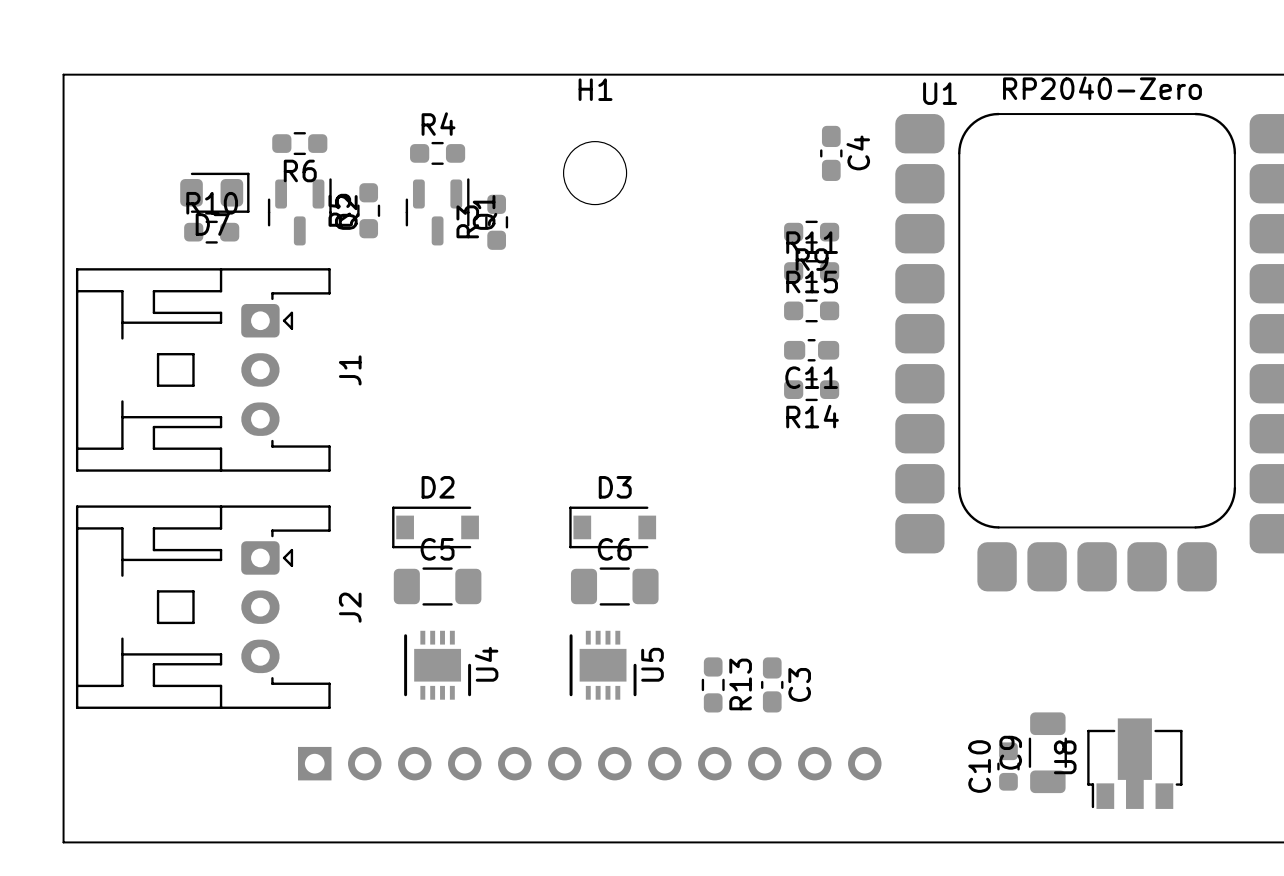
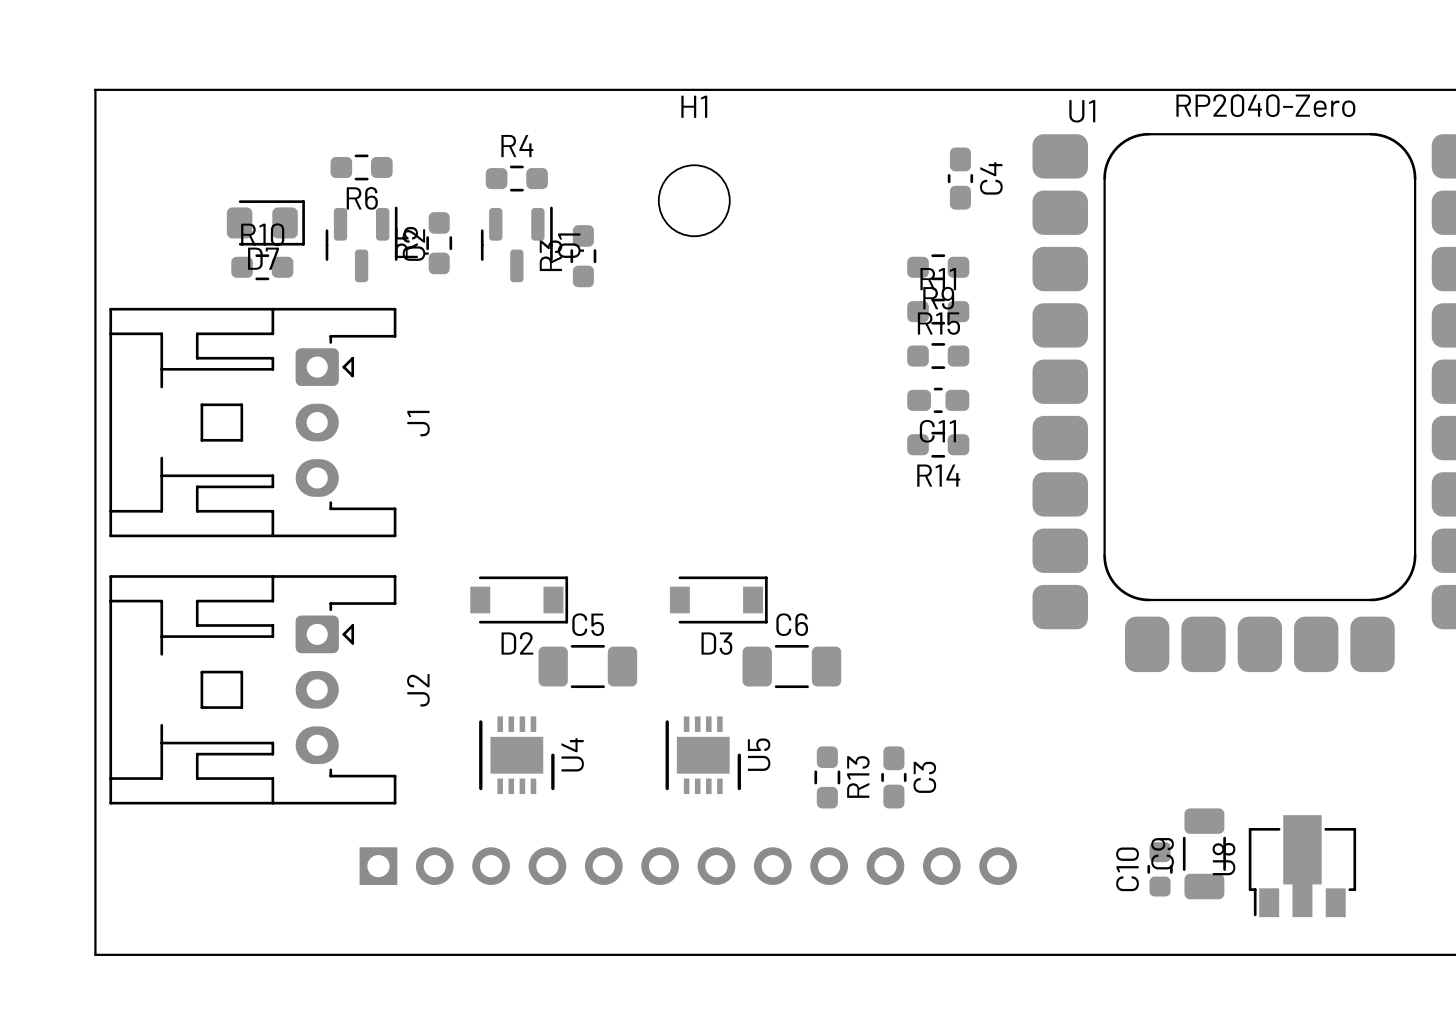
D2 rotation: 0° (435, 527) -> 180° (519, 599)
D3 rotation: 0° (612, 527) -> 180° (718, 599)
C5 position: (437, 586) -> (587, 666)
C6 position: (614, 586) -> (791, 666)

